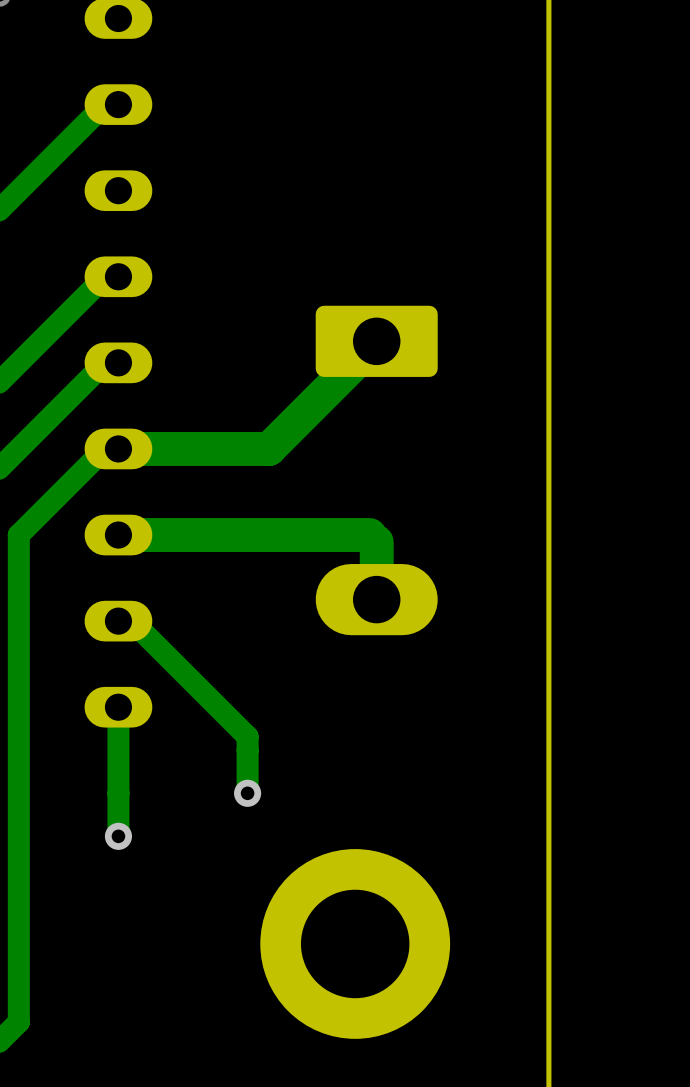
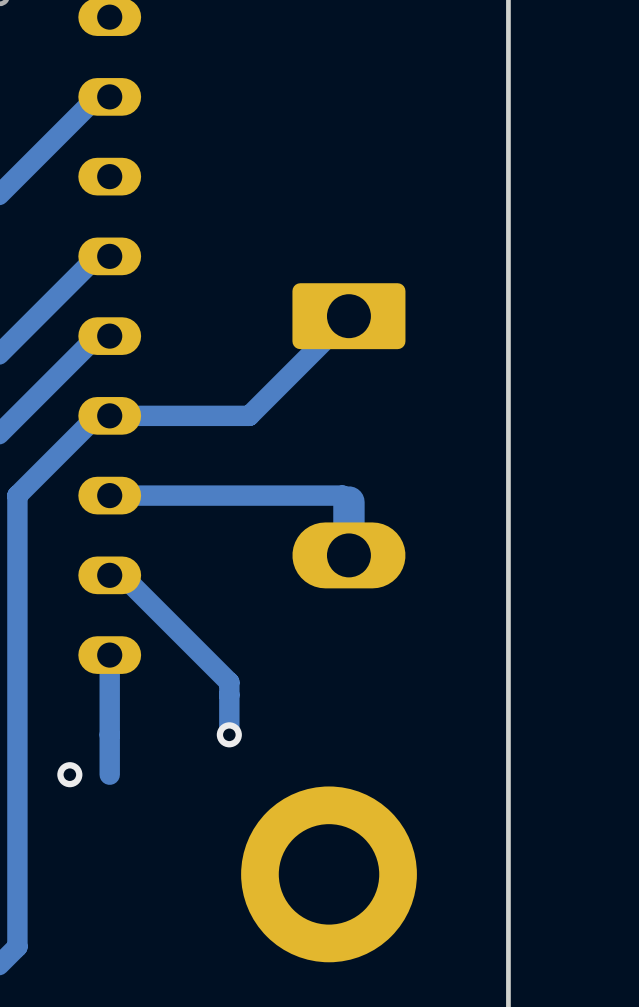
track width: thick (376, 341) (269, 448) (118, 448) -> thin (348, 316) (249, 415) (109, 415)
track width: thick (369, 535) (118, 535) -> thin (342, 495) (109, 495)
via position: (118, 836) -> (69, 774)

